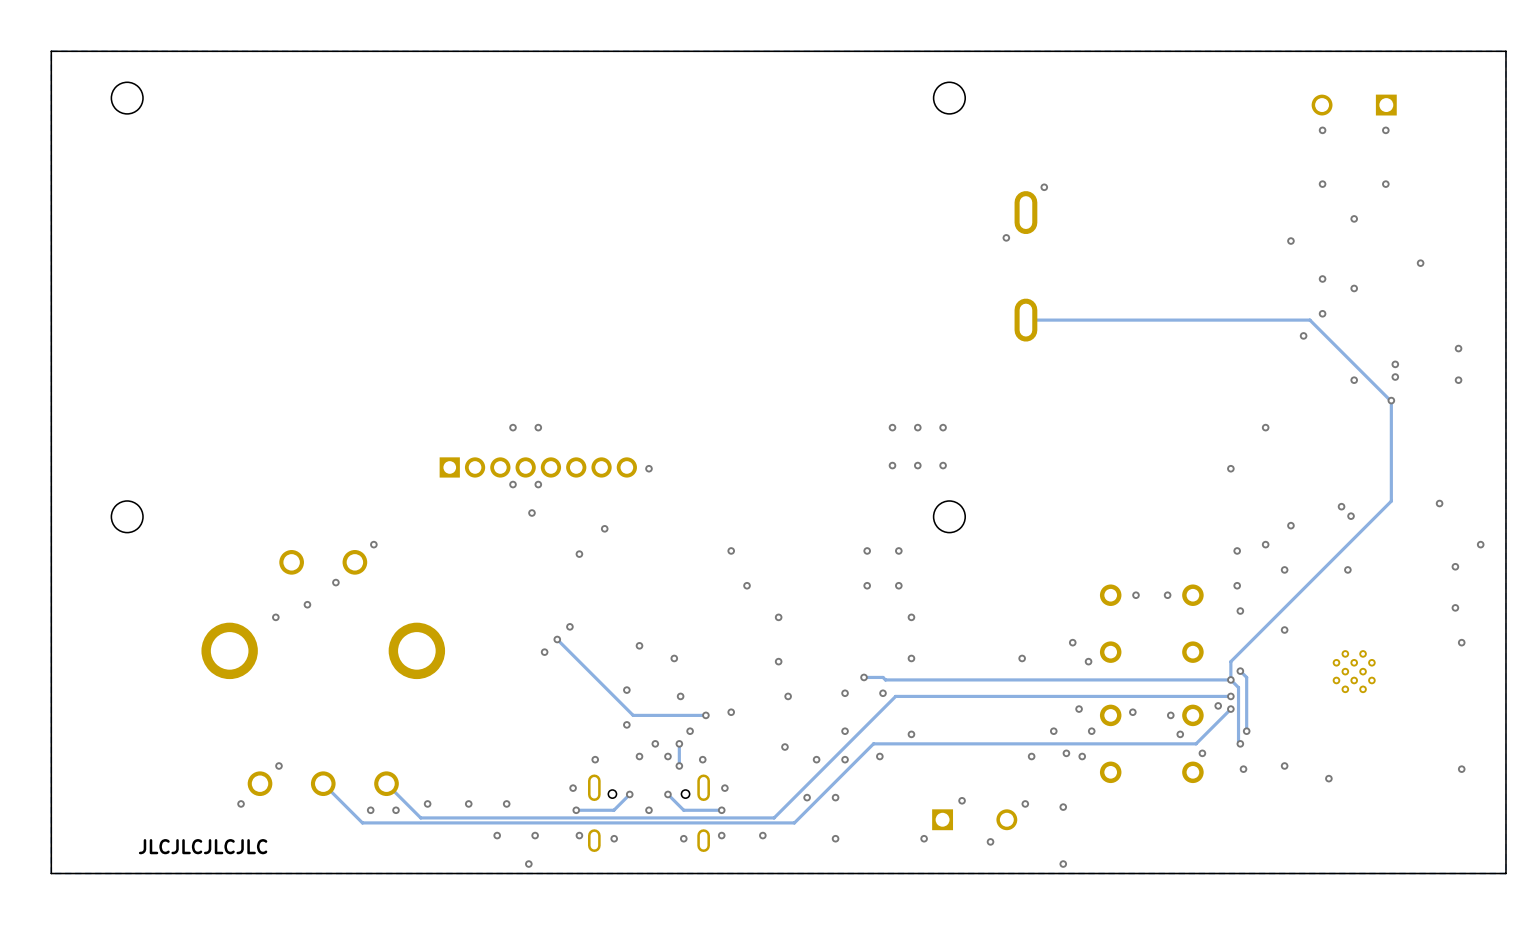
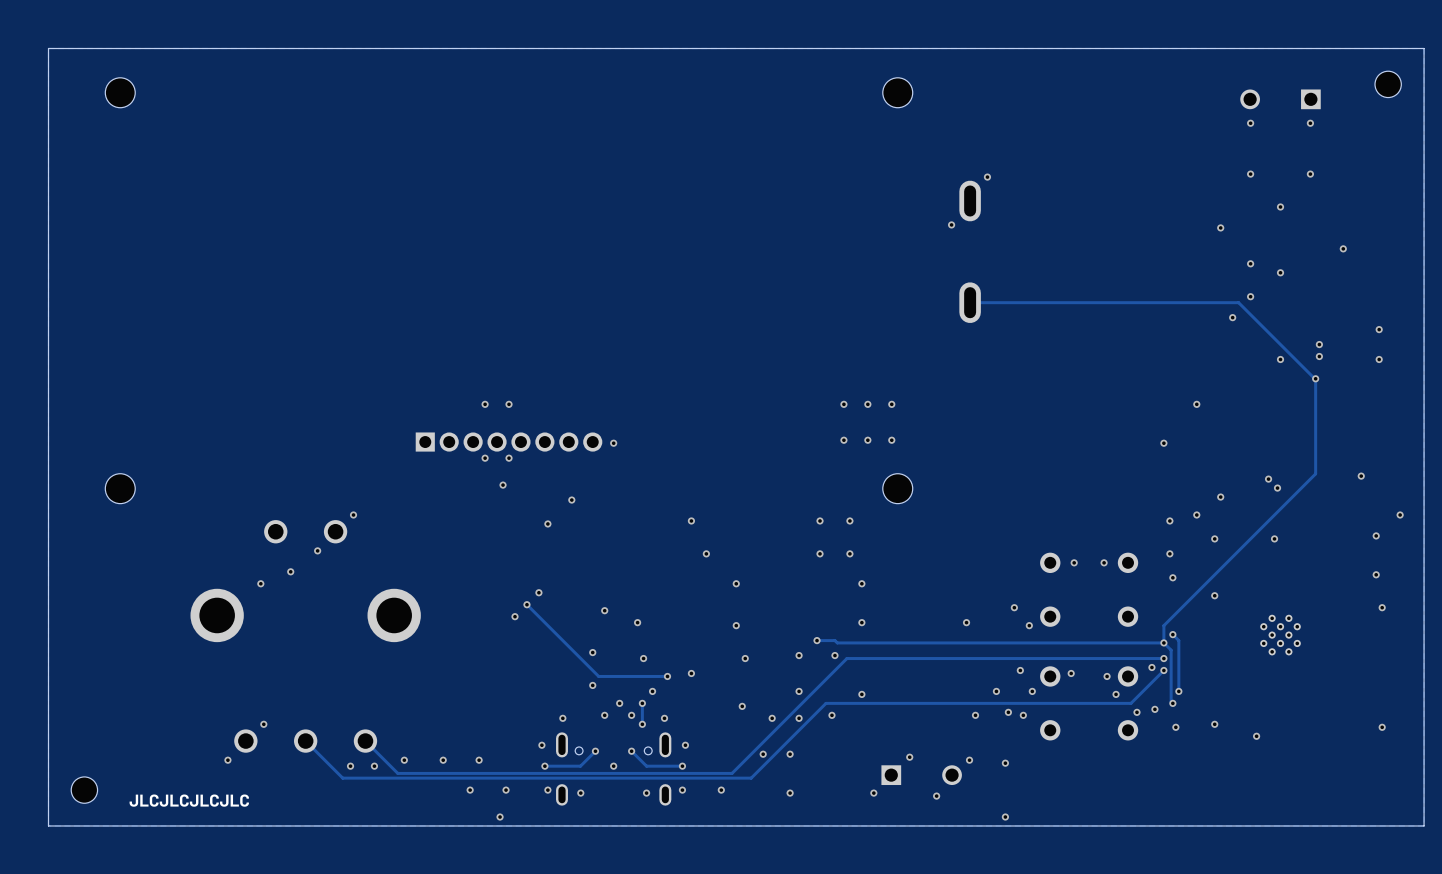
part: none -> (1388, 84)
via: none -> (1154, 709)
part: none -> (84, 790)

